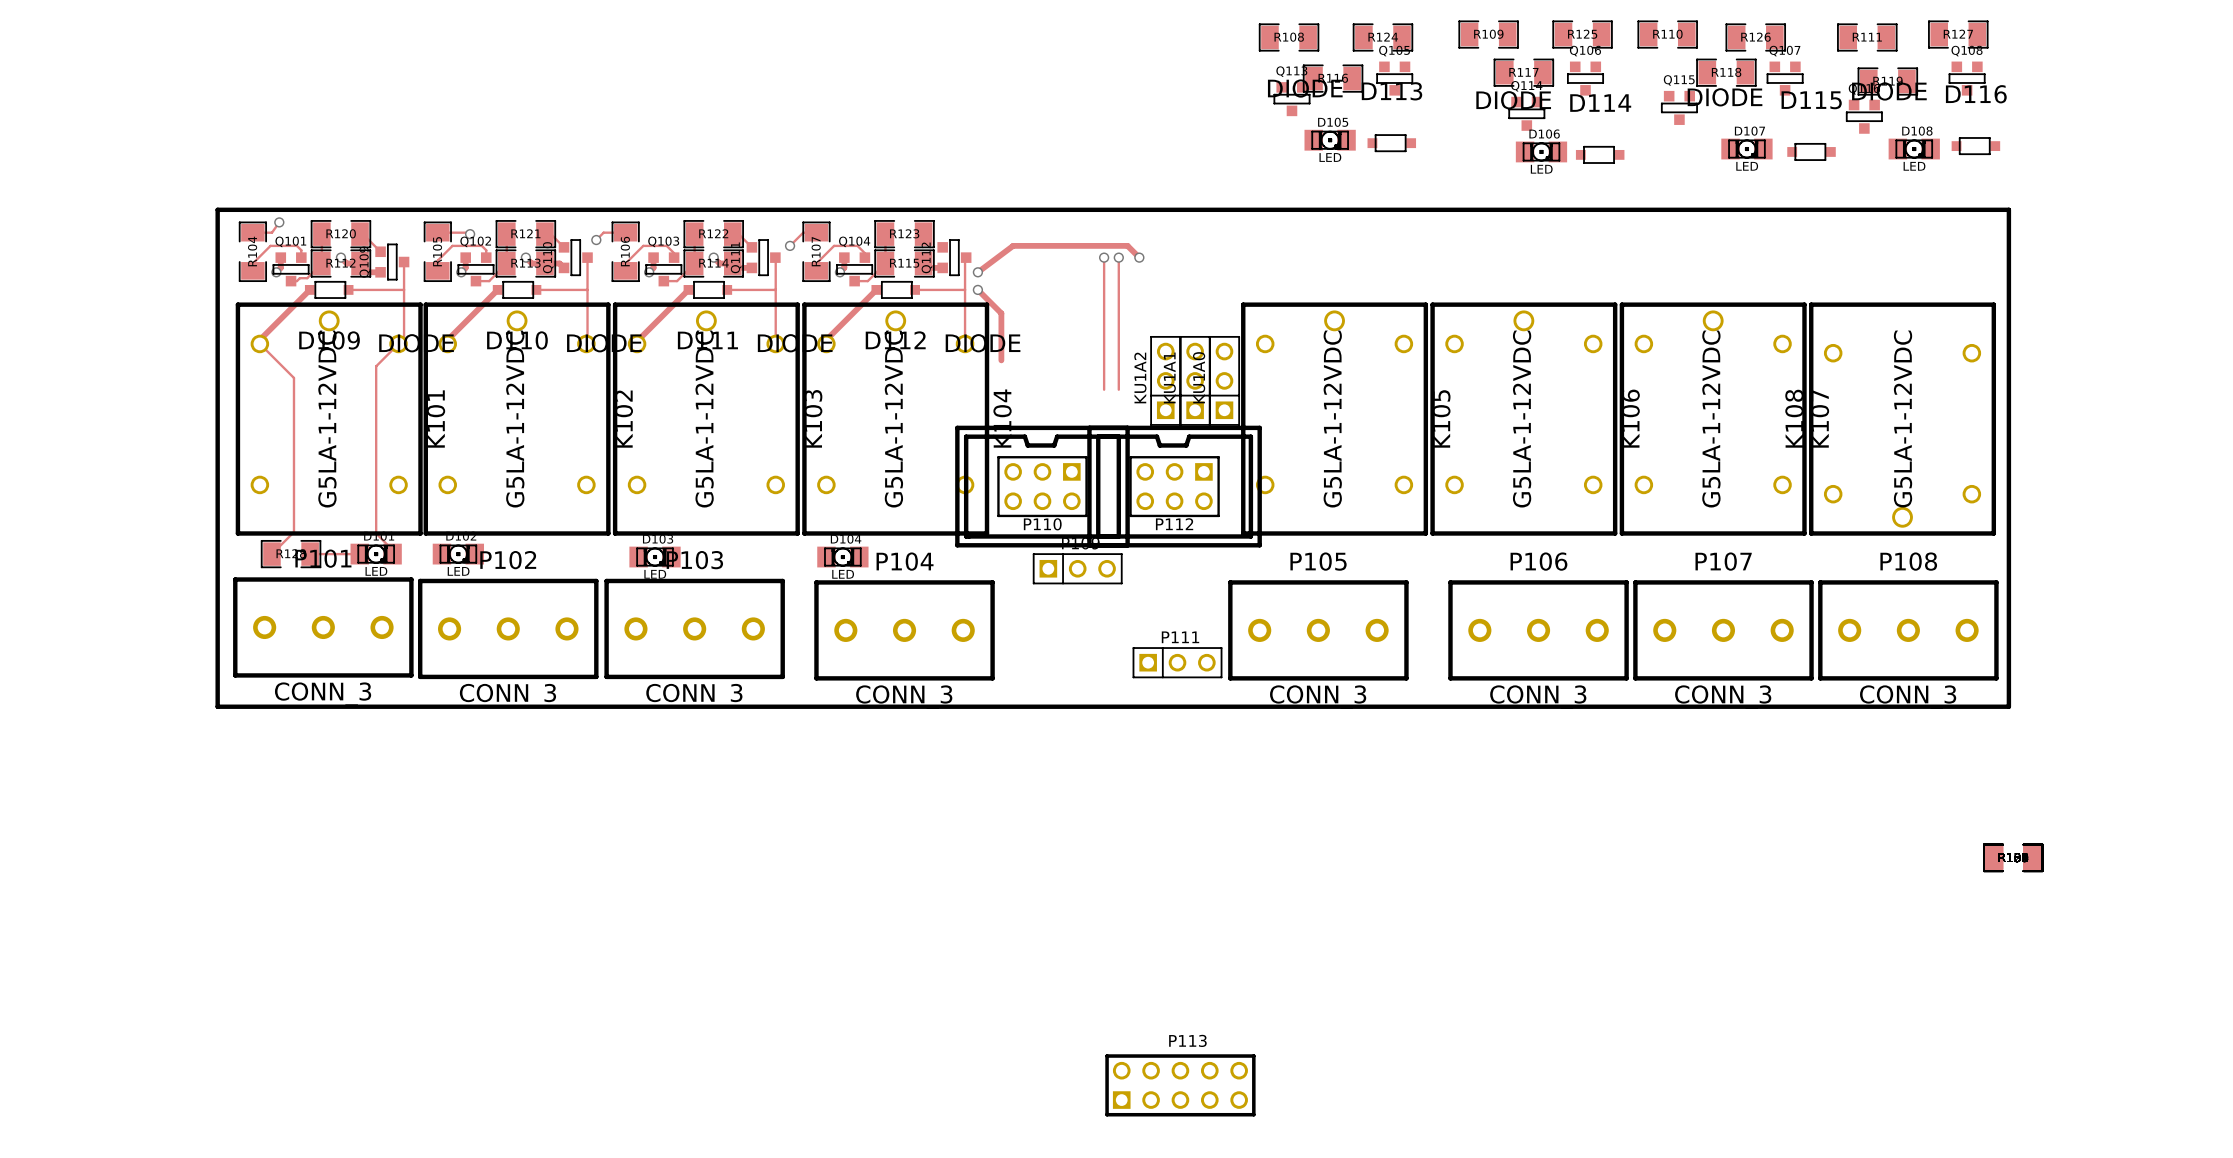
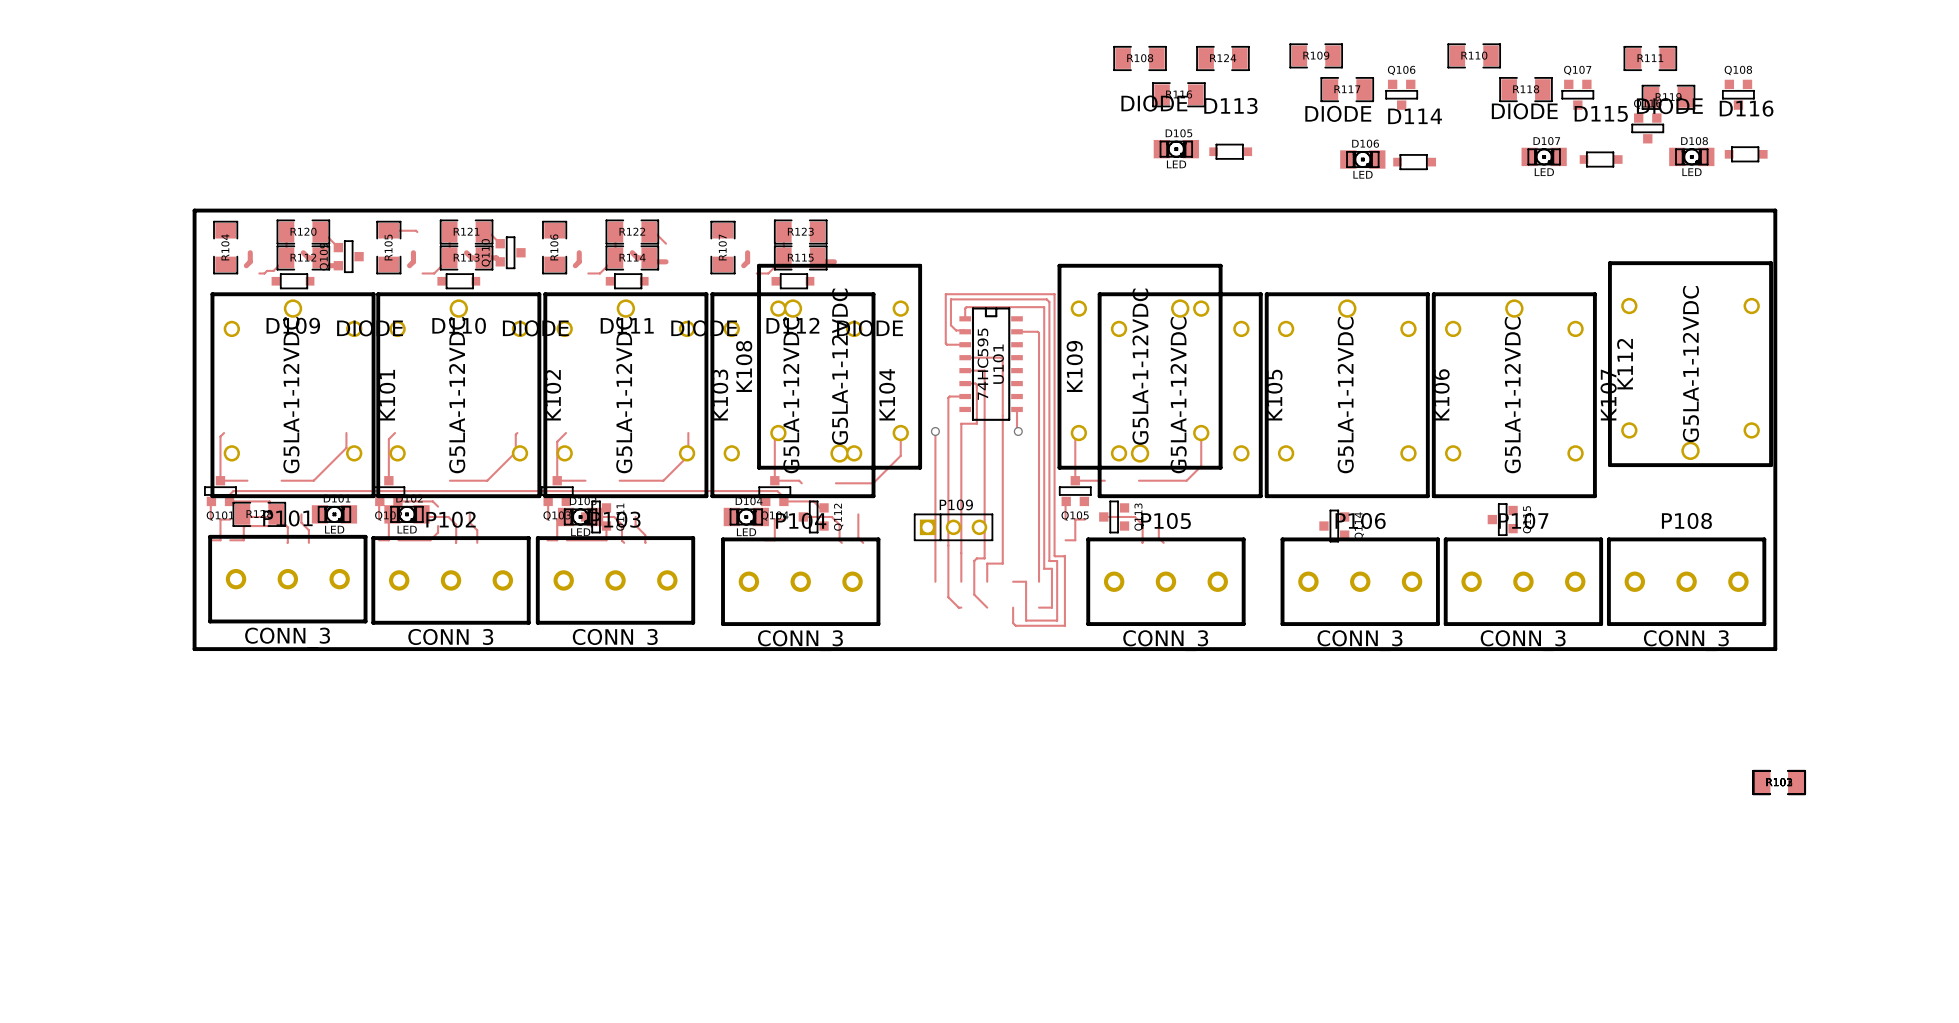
R125: (1582, 34) -> none
R127: (1958, 34) -> none
R126: (1755, 37) -> none
Q105 rotation: 0° (1394, 78) -> 180° (1075, 491)
Q105 position: (1394, 78) -> (1075, 491)
Q113 rotation: 0° (1291, 99) -> 90° clockwise (1114, 516)
Q113 position: (1291, 99) -> (1114, 516)
Q115 rotation: 0° (1679, 107) -> 90° clockwise (1502, 519)
Q115 position: (1679, 107) -> (1502, 519)
Q114 rotation: 0° (1526, 113) -> 90° clockwise (1334, 526)
Q114 position: (1526, 113) -> (1334, 526)
track: (279, 222) (271, 232) (252, 232) -> none
via: (279, 222) -> none
track: (625, 232) (603, 232) (596, 240) -> none
track: (816, 232) (803, 232) (790, 245) -> none
via: (470, 234) -> none
via: (596, 240) -> none
via: (790, 245) -> none
track: (301, 257) (301, 250) (296, 245) (270, 245) (252, 263) (252, 270) -> none
via: (340, 257) -> none
track: (486, 257) (486, 250) (481, 245) (452, 245) (437, 260) (437, 270) -> none
via: (525, 257) -> none
track: (587, 257) (586, 343) -> none
track: (674, 257) (674, 253) (666, 245) (643, 245) (625, 263) (625, 270) -> none
via: (713, 257) -> none
Q111 rotation: 0° (763, 257) -> 180° (596, 516)
Q111 position: (763, 257) -> (596, 516)
track: (775, 257) (775, 343) -> none
track: (864, 257) (864, 253) (857, 245) (834, 245) (816, 263) (816, 270) -> none
Q112 rotation: 0° (954, 257) -> 180° (813, 516)
Q112 position: (954, 257) -> (813, 516)
track: (966, 257) (965, 343) -> none
track: (1104, 257) (1104, 389) -> none
via: (1104, 257) -> none
track: (1118, 257) (1118, 389) -> none
via: (1118, 257) -> none
track: (1139, 257) (1127, 245) (1013, 245) (977, 272) -> none
via: (1139, 257) -> none
track: (404, 262) (404, 338) (376, 366) (376, 533) (392, 549) (392, 554) -> none
Q101 rotation: 0° (291, 269) -> 180° (220, 491)
Q101 position: (291, 269) -> (220, 491)
Q102 rotation: 0° (475, 269) -> 180° (388, 491)
Q102 position: (475, 269) -> (388, 491)
Q103 rotation: 0° (663, 269) -> 180° (557, 491)
Q103 position: (663, 269) -> (557, 491)
Q104 rotation: 0° (854, 269) -> 180° (774, 491)
Q104 position: (854, 269) -> (774, 491)
via: (276, 272) -> none
via: (461, 272) -> none
via: (649, 272) -> none
via: (839, 272) -> none
via: (977, 272) -> none
track: (309, 289) (259, 339) (259, 343) -> none
track: (348, 289) (404, 289) -> none
track: (497, 289) (447, 339) (447, 343) -> none
track: (536, 289) (587, 289) -> none
track: (688, 289) (637, 341) (637, 343) -> none
track: (727, 289) (775, 289) -> none
track: (876, 289) (826, 339) (826, 343) -> none
track: (915, 289) (965, 289) -> none
track: (977, 289) (1001, 313) (1001, 360) -> none
via: (977, 289) -> none
track: none -> (965, 318) (966, 307) (1044, 307) (1044, 568) (1051, 568) (1051, 607) (1039, 607)
track: (259, 343) (293, 377) (293, 532) (271, 554) -> none
track: none -> (965, 331) (956, 330) (950, 325) (950, 299) (1046, 299) (1049, 301) (1049, 561) (1057, 561) (1057, 620) (1026, 620) (1026, 581) (1013, 581)
track: none -> (1017, 331) (1039, 333) (1039, 581)
track: none -> (965, 344) (945, 343) (945, 294) (1054, 294) (1054, 555) (1064, 555) (1064, 625) (1015, 625) (1013, 623) (1013, 607)
track: none -> (965, 357) (1002, 358) (1002, 563) (987, 563) (987, 581)
KU1A2: (1165, 380) -> none
KU1A1: (1195, 380) -> none
KU1A0: (1224, 380) -> none
U101: none -> 74HC595 (991, 364)
K112: none -> G5LA-1-12VDC (1690, 364)
K109: none -> G5LA-1-12VDC (1140, 366)
track: none -> (965, 370) (984, 370) (984, 558) (976, 558) (974, 561) (974, 594) (987, 607)
track: none -> (965, 383) (976, 384) (976, 423) (961, 423) (961, 581)
K108 position: (1902, 419) -> (839, 366)
track: none -> (965, 396) (948, 397) (948, 597) (958, 607) (961, 607)
track: none -> (1017, 409) (1018, 431)
track: none -> (935, 431) (935, 581)
via: none -> (935, 431)
via: none -> (1018, 431)
track: none -> (224, 433) (220, 436) (220, 480) (247, 480)
track: none -> (346, 433) (346, 448) (313, 480) (281, 480)
track: none -> (395, 433) (388, 439) (388, 480)
track: none -> (517, 433) (515, 452) (487, 480) (449, 480)
track: none -> (565, 433) (557, 441) (557, 480) (585, 480)
track: none -> (688, 433) (688, 455) (663, 480) (619, 480)
track: none -> (778, 433) (774, 436) (774, 480) (799, 480) (801, 483)
track: none -> (900, 433) (900, 455) (873, 483) (835, 483)
track: none -> (1078, 433) (1075, 436) (1075, 480) (1104, 480)
track: none -> (1201, 433) (1201, 466) (1186, 480) (1138, 480)
P110: (1042, 486) -> none
P112: (1174, 486) -> none
track: none -> (211, 501) (210, 519)
track: none -> (379, 501) (379, 519)
track: none -> (397, 501) (432, 501) (438, 506)
track: none -> (548, 501) (547, 519)
track: none -> (1066, 501) (1065, 519)
track: none -> (269, 507) (269, 501) (229, 501) (229, 494) (233, 491) (777, 491) (783, 497) (783, 501) (813, 501) (820, 507) (824, 507)
track: (310, 554) (359, 554) -> none
track: none -> (301, 514) (301, 522) (308, 530) (308, 542)
track: none -> (469, 514) (469, 522) (477, 530) (477, 542)
track: none -> (858, 514) (858, 538) (863, 542)
track: none -> (248, 516) (277, 516) (287, 527) (287, 542)
track: none -> (417, 516) (448, 516) (456, 524) (455, 542)
track: none -> (585, 516) (614, 516) (621, 524) (621, 540) (624, 542)
track: none -> (635, 516) (635, 525) (645, 535) (645, 542)
track: none -> (803, 516) (831, 516) (839, 524) (839, 540) (841, 542)
track: none -> (1103, 516) (1134, 516) (1142, 524) (1142, 542)
track: none -> (1158, 516) (1158, 538) (1163, 542)
track: none -> (230, 519) (220, 519) (220, 540) (210, 540)
track: none -> (398, 519) (388, 519) (388, 540) (379, 540)
track: none -> (566, 519) (557, 519) (557, 540) (547, 540)
track: none -> (784, 519) (774, 519) (774, 540) (765, 540)
track: none -> (1085, 519) (1075, 519) (1075, 540) (1065, 540)
track: none -> (269, 526) (245, 526) (243, 540) (230, 540)
track: none -> (438, 526) (438, 532) (430, 540) (398, 540)
track: none -> (606, 526) (606, 540) (566, 540)
P111: (1177, 662) -> none
part: (2013, 857) -> none
part: (2013, 857) -> none
part: (2013, 857) -> none
part: (2013, 857) -> none
part: (2013, 857) -> none
part: (2013, 857) -> none
part: (2013, 857) -> none
P113: (1180, 1085) -> none

